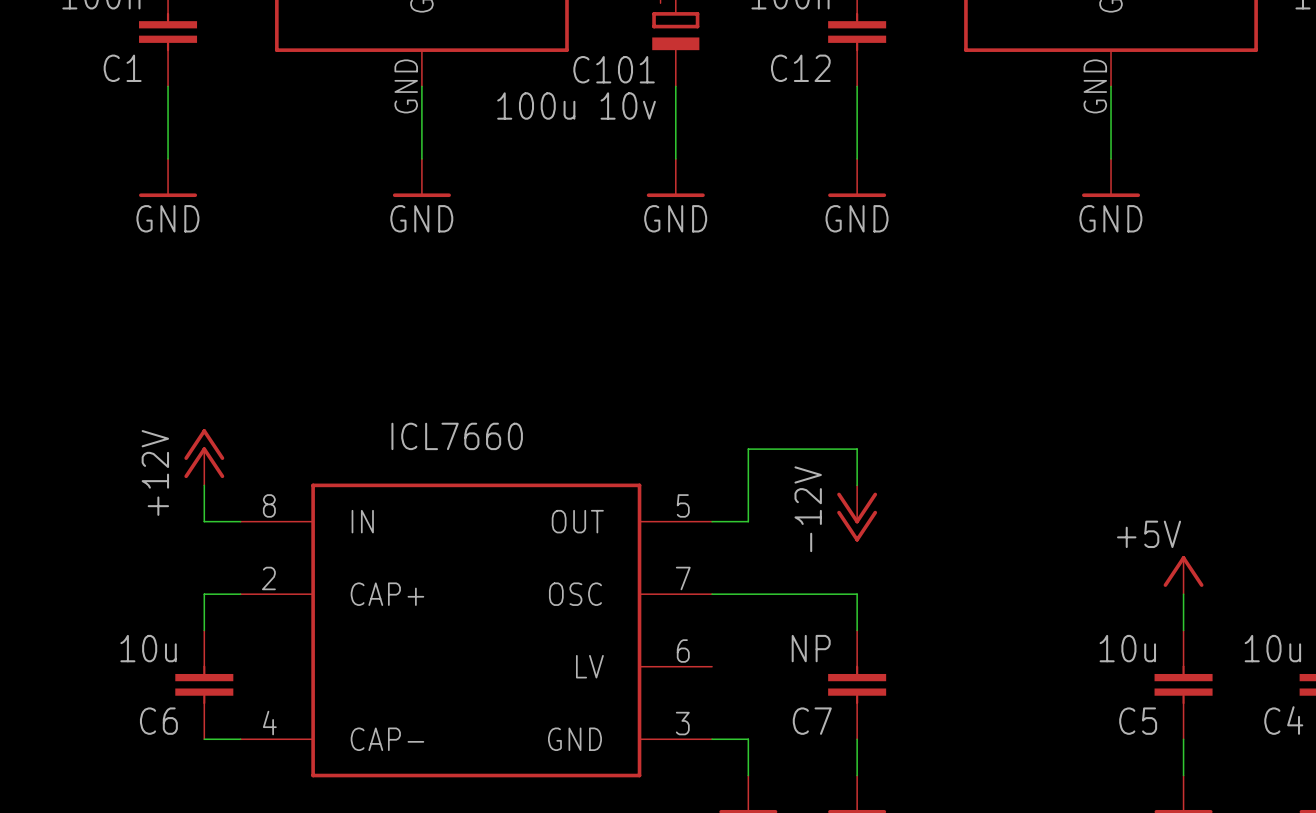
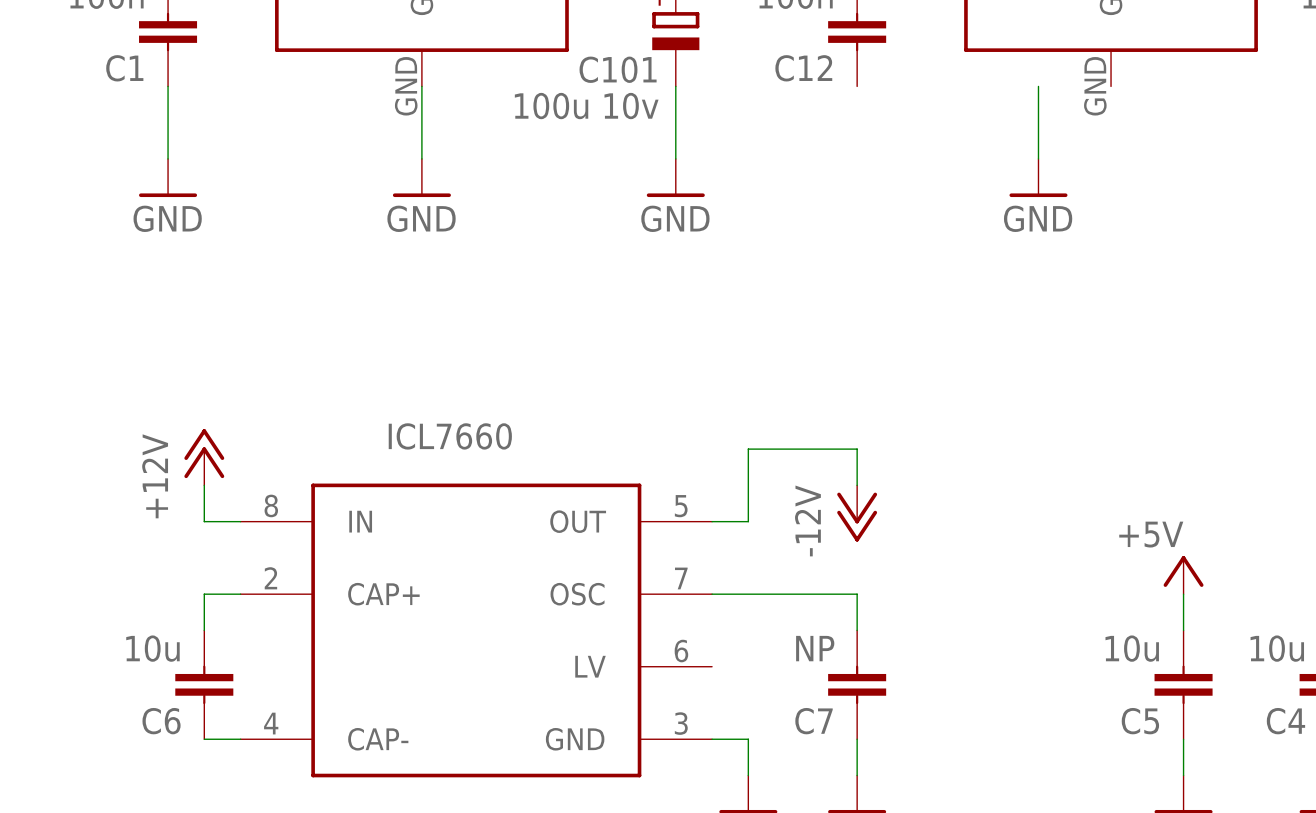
wire: (857, 86) (857, 158) -> none
wire: (1111, 86) (1111, 158) -> (1038, 86) (1038, 158)
power symbol: GND (857, 178) -> none
power symbol position: GND (1111, 178) -> GND (1038, 178)

